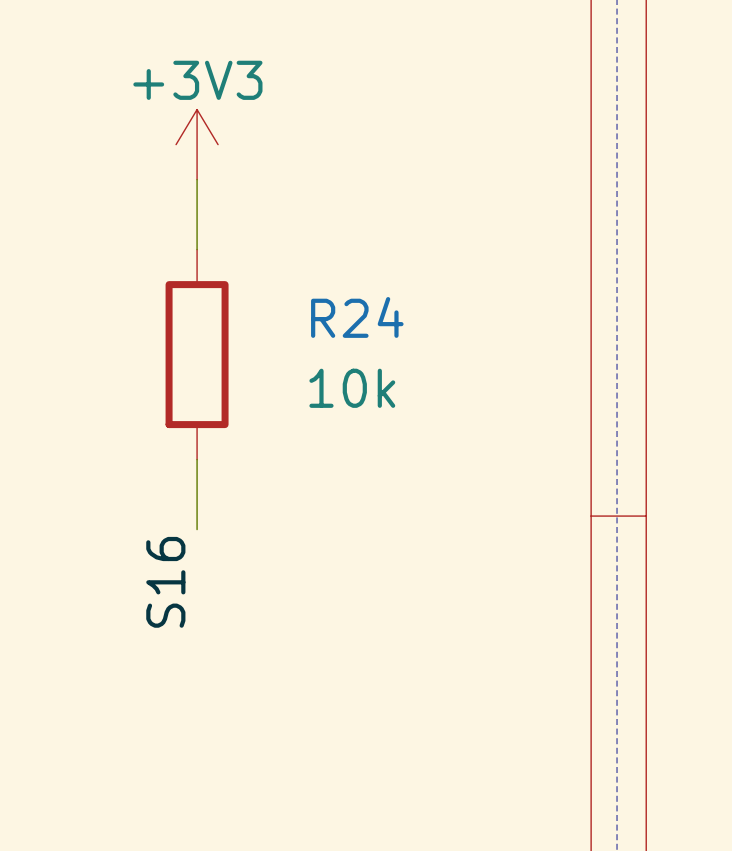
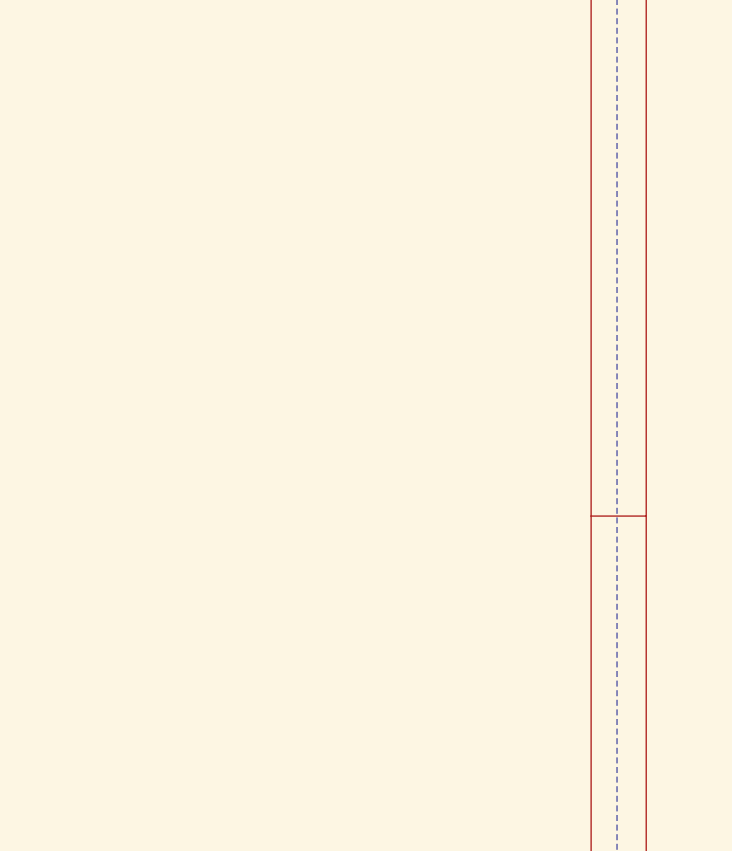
power symbol: +3V3 (197, 144) -> none
wire: (197, 179) (197, 249) -> none
R24: 10k (197, 354) -> none
wire: (197, 459) (197, 529) -> none
label: S16 (165, 582) -> none

